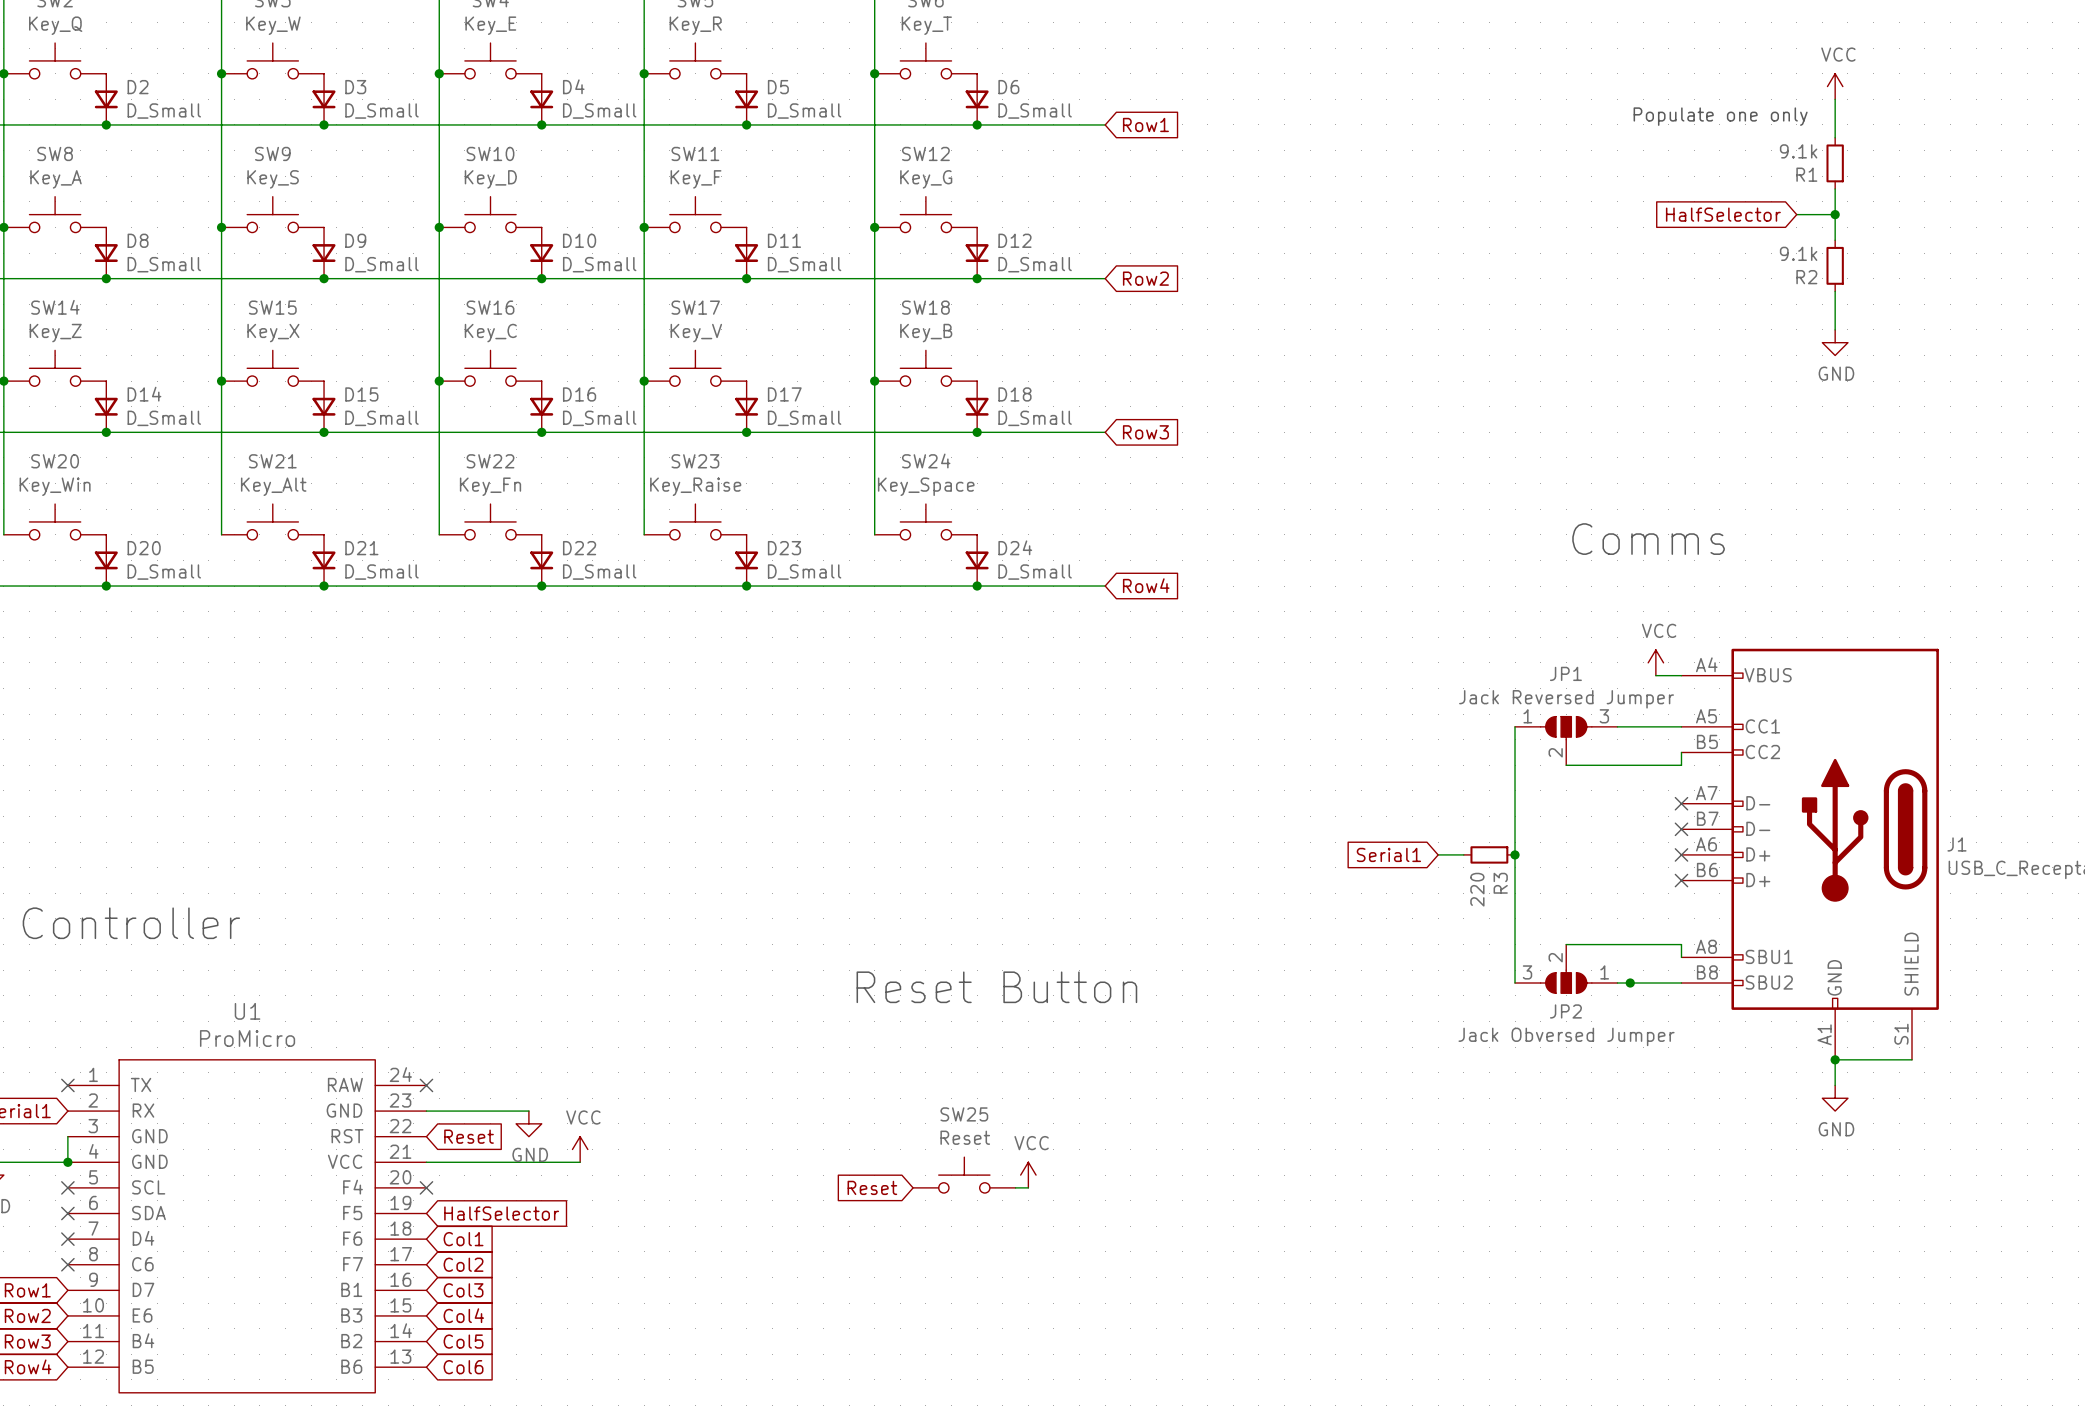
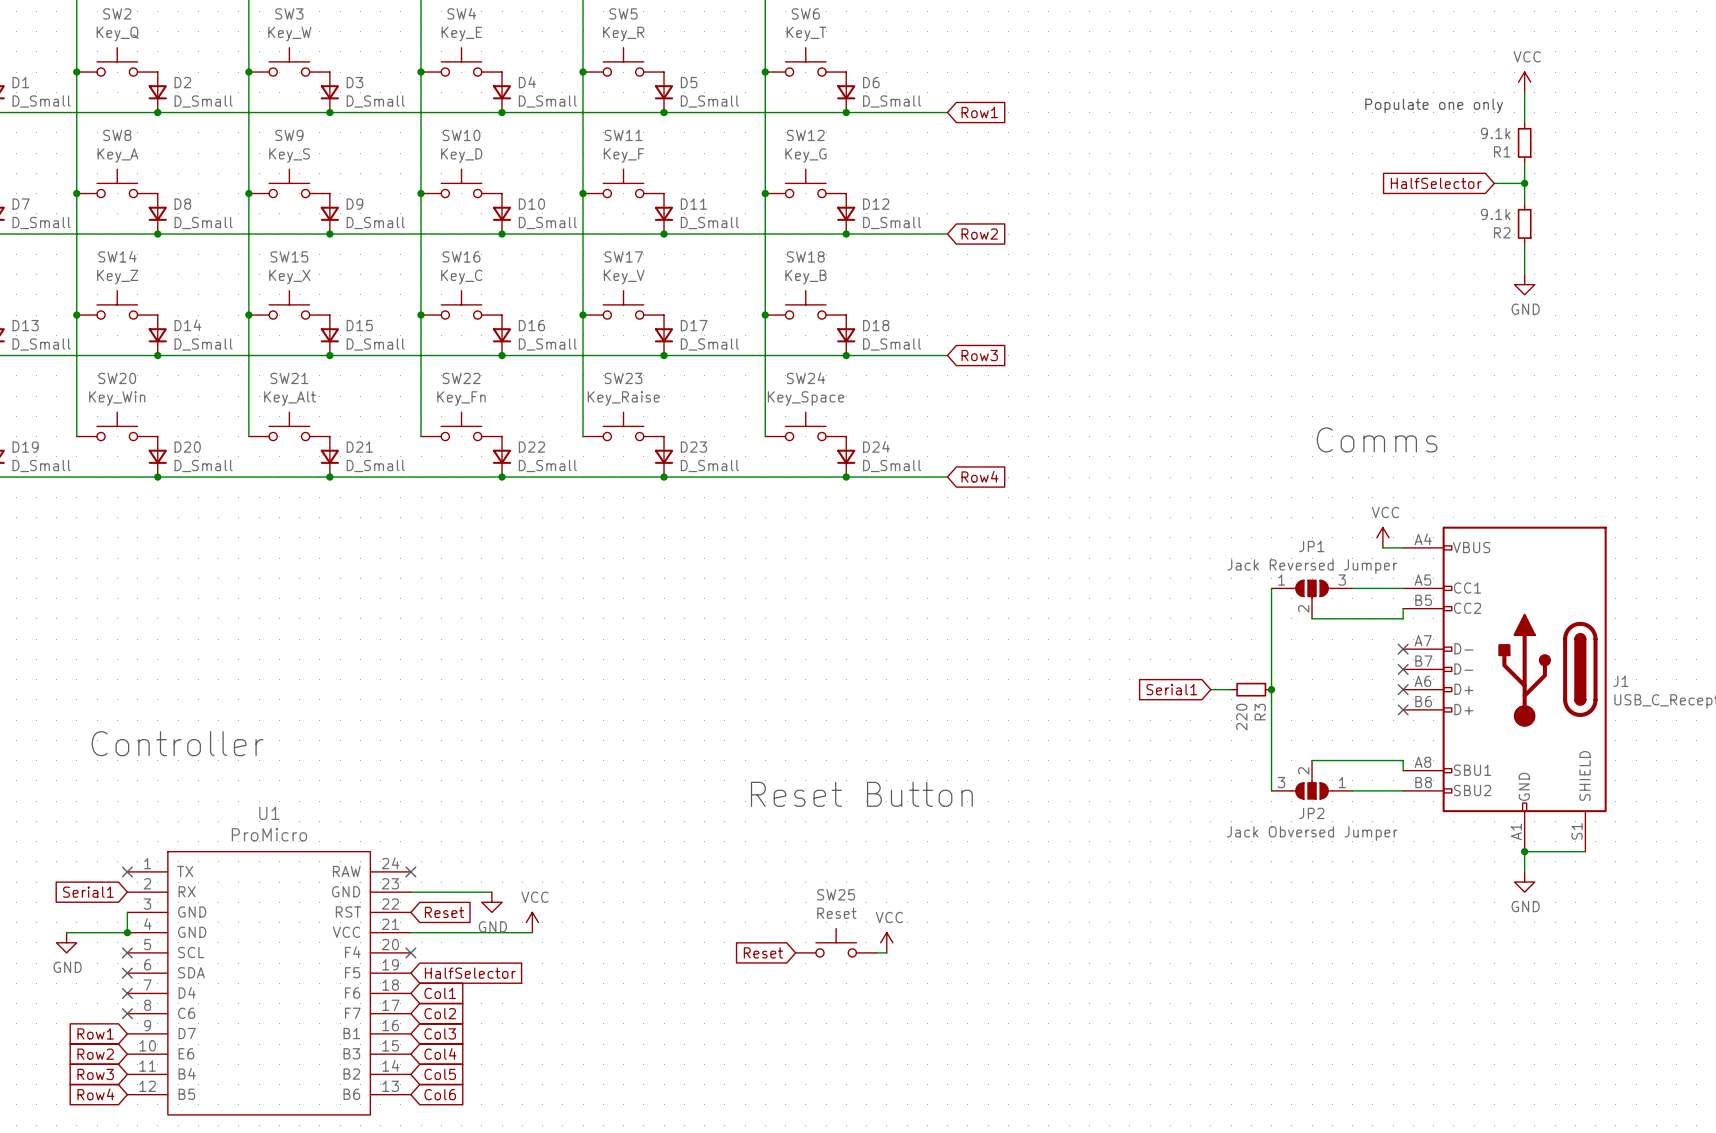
junction: (1630, 983) -> none

